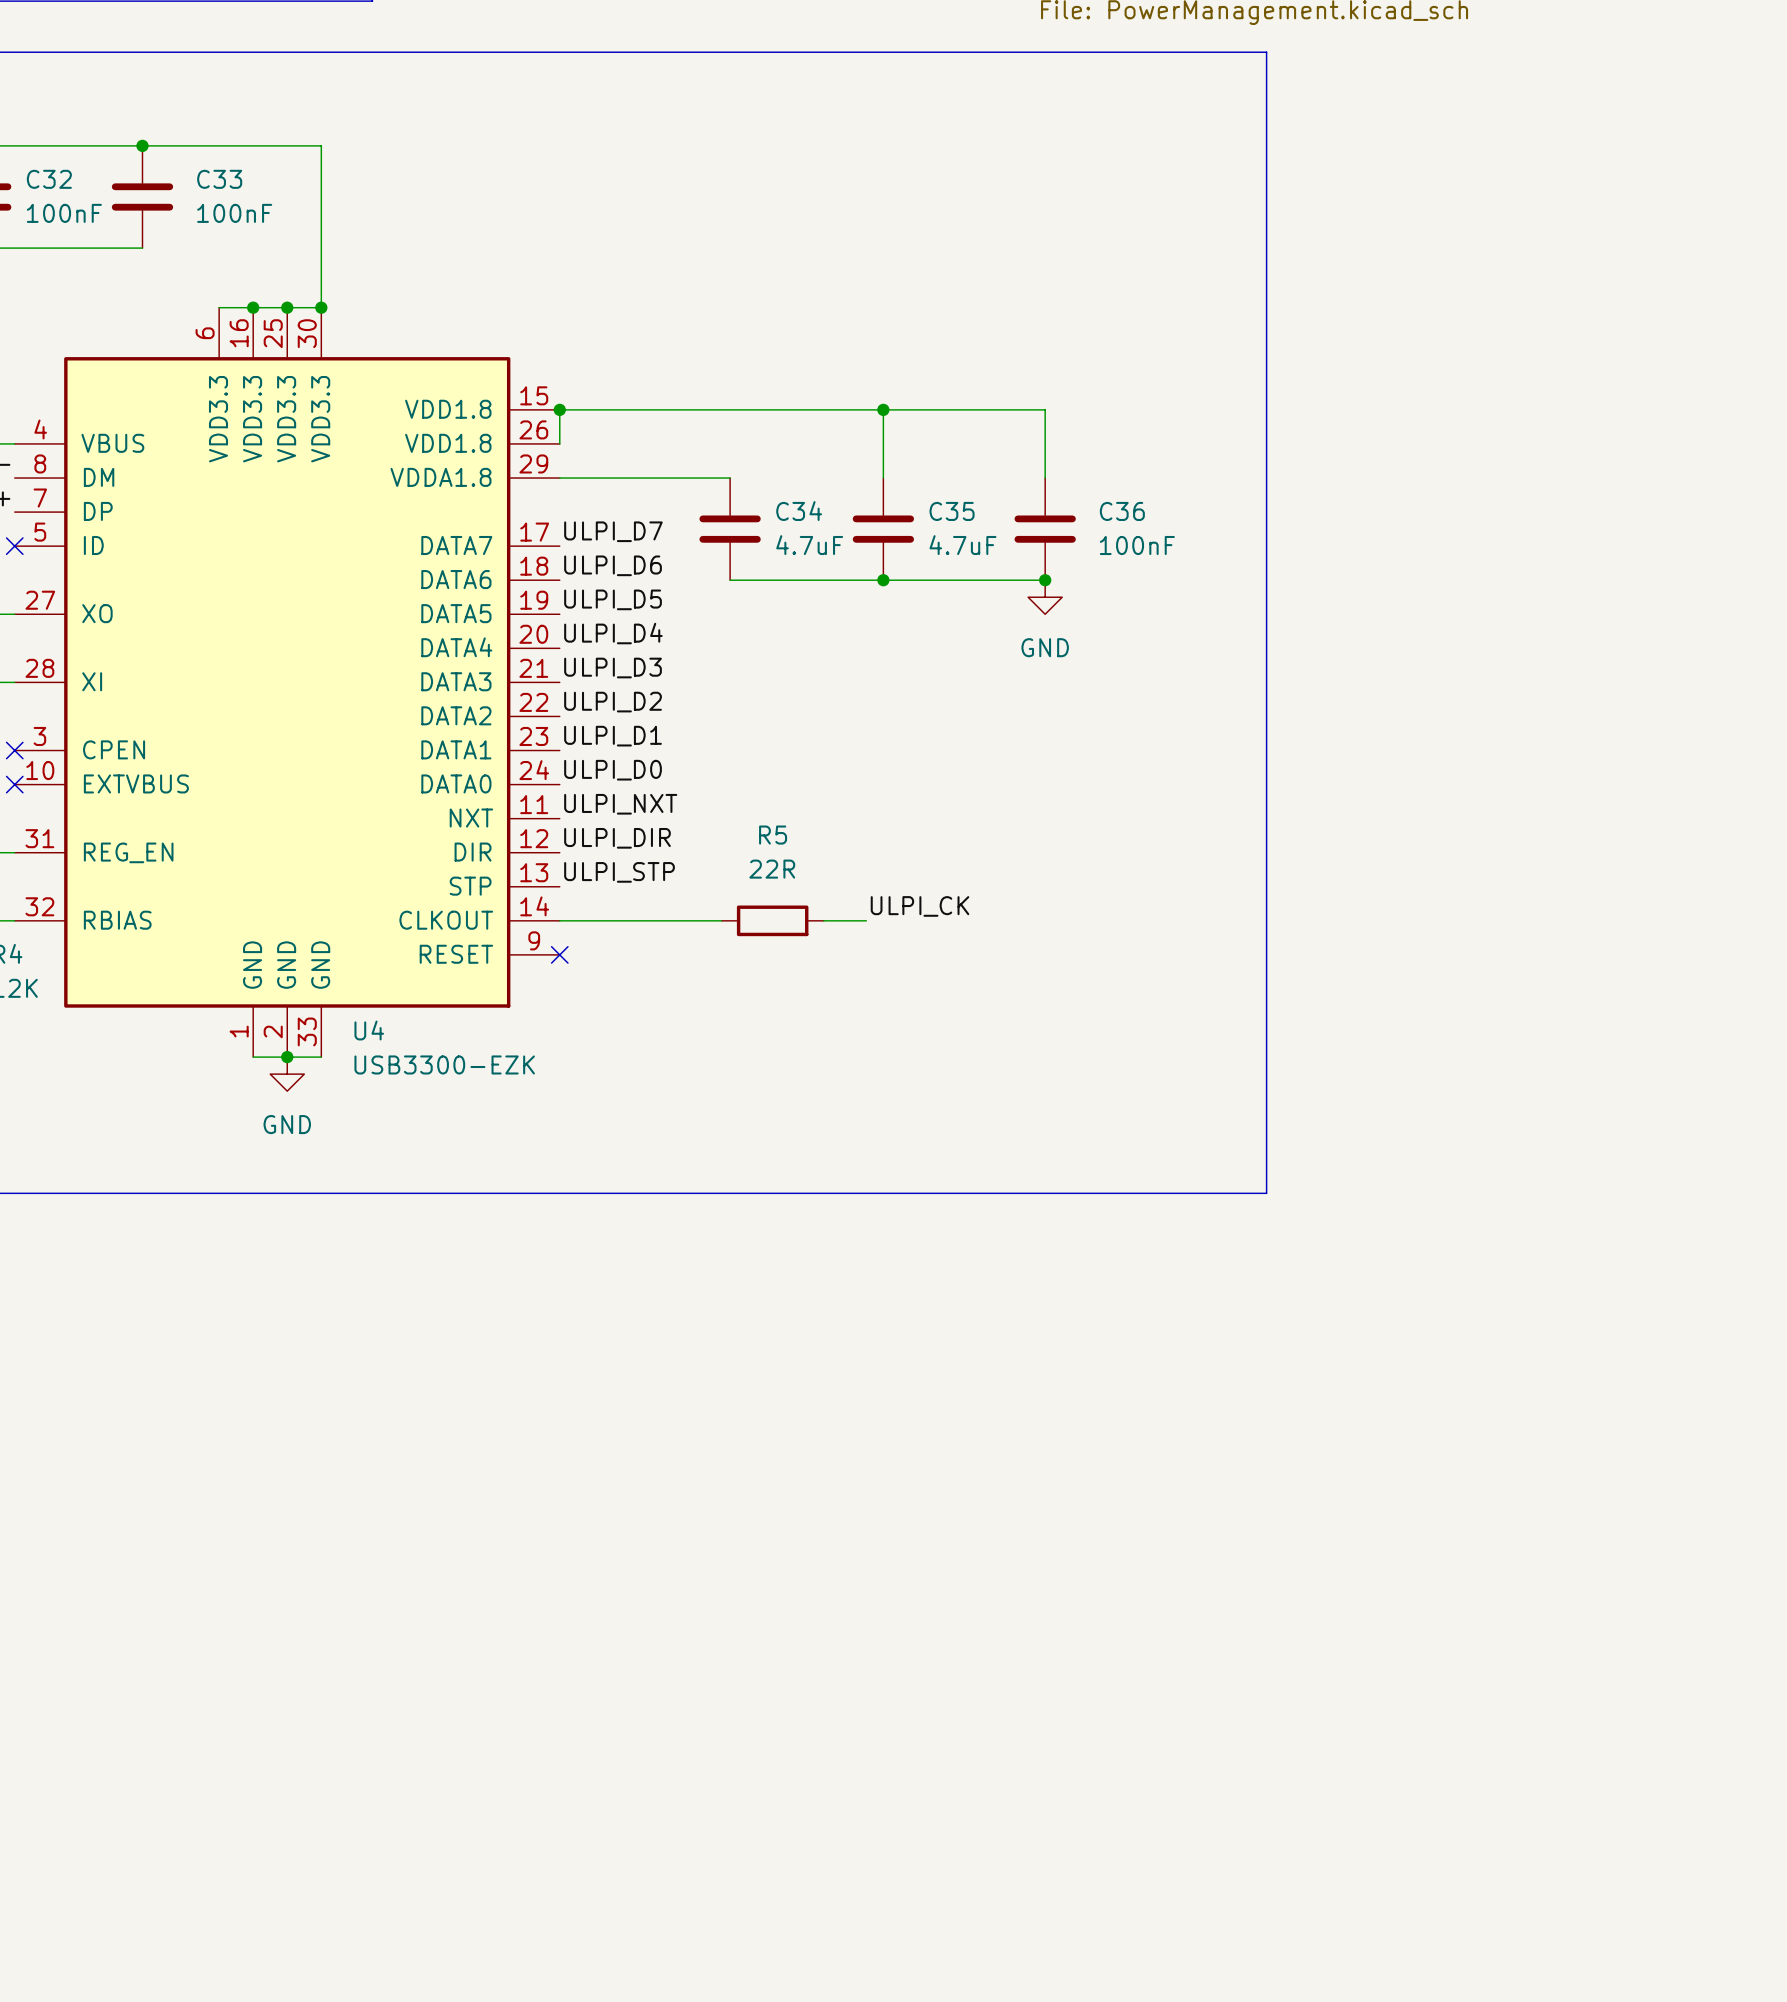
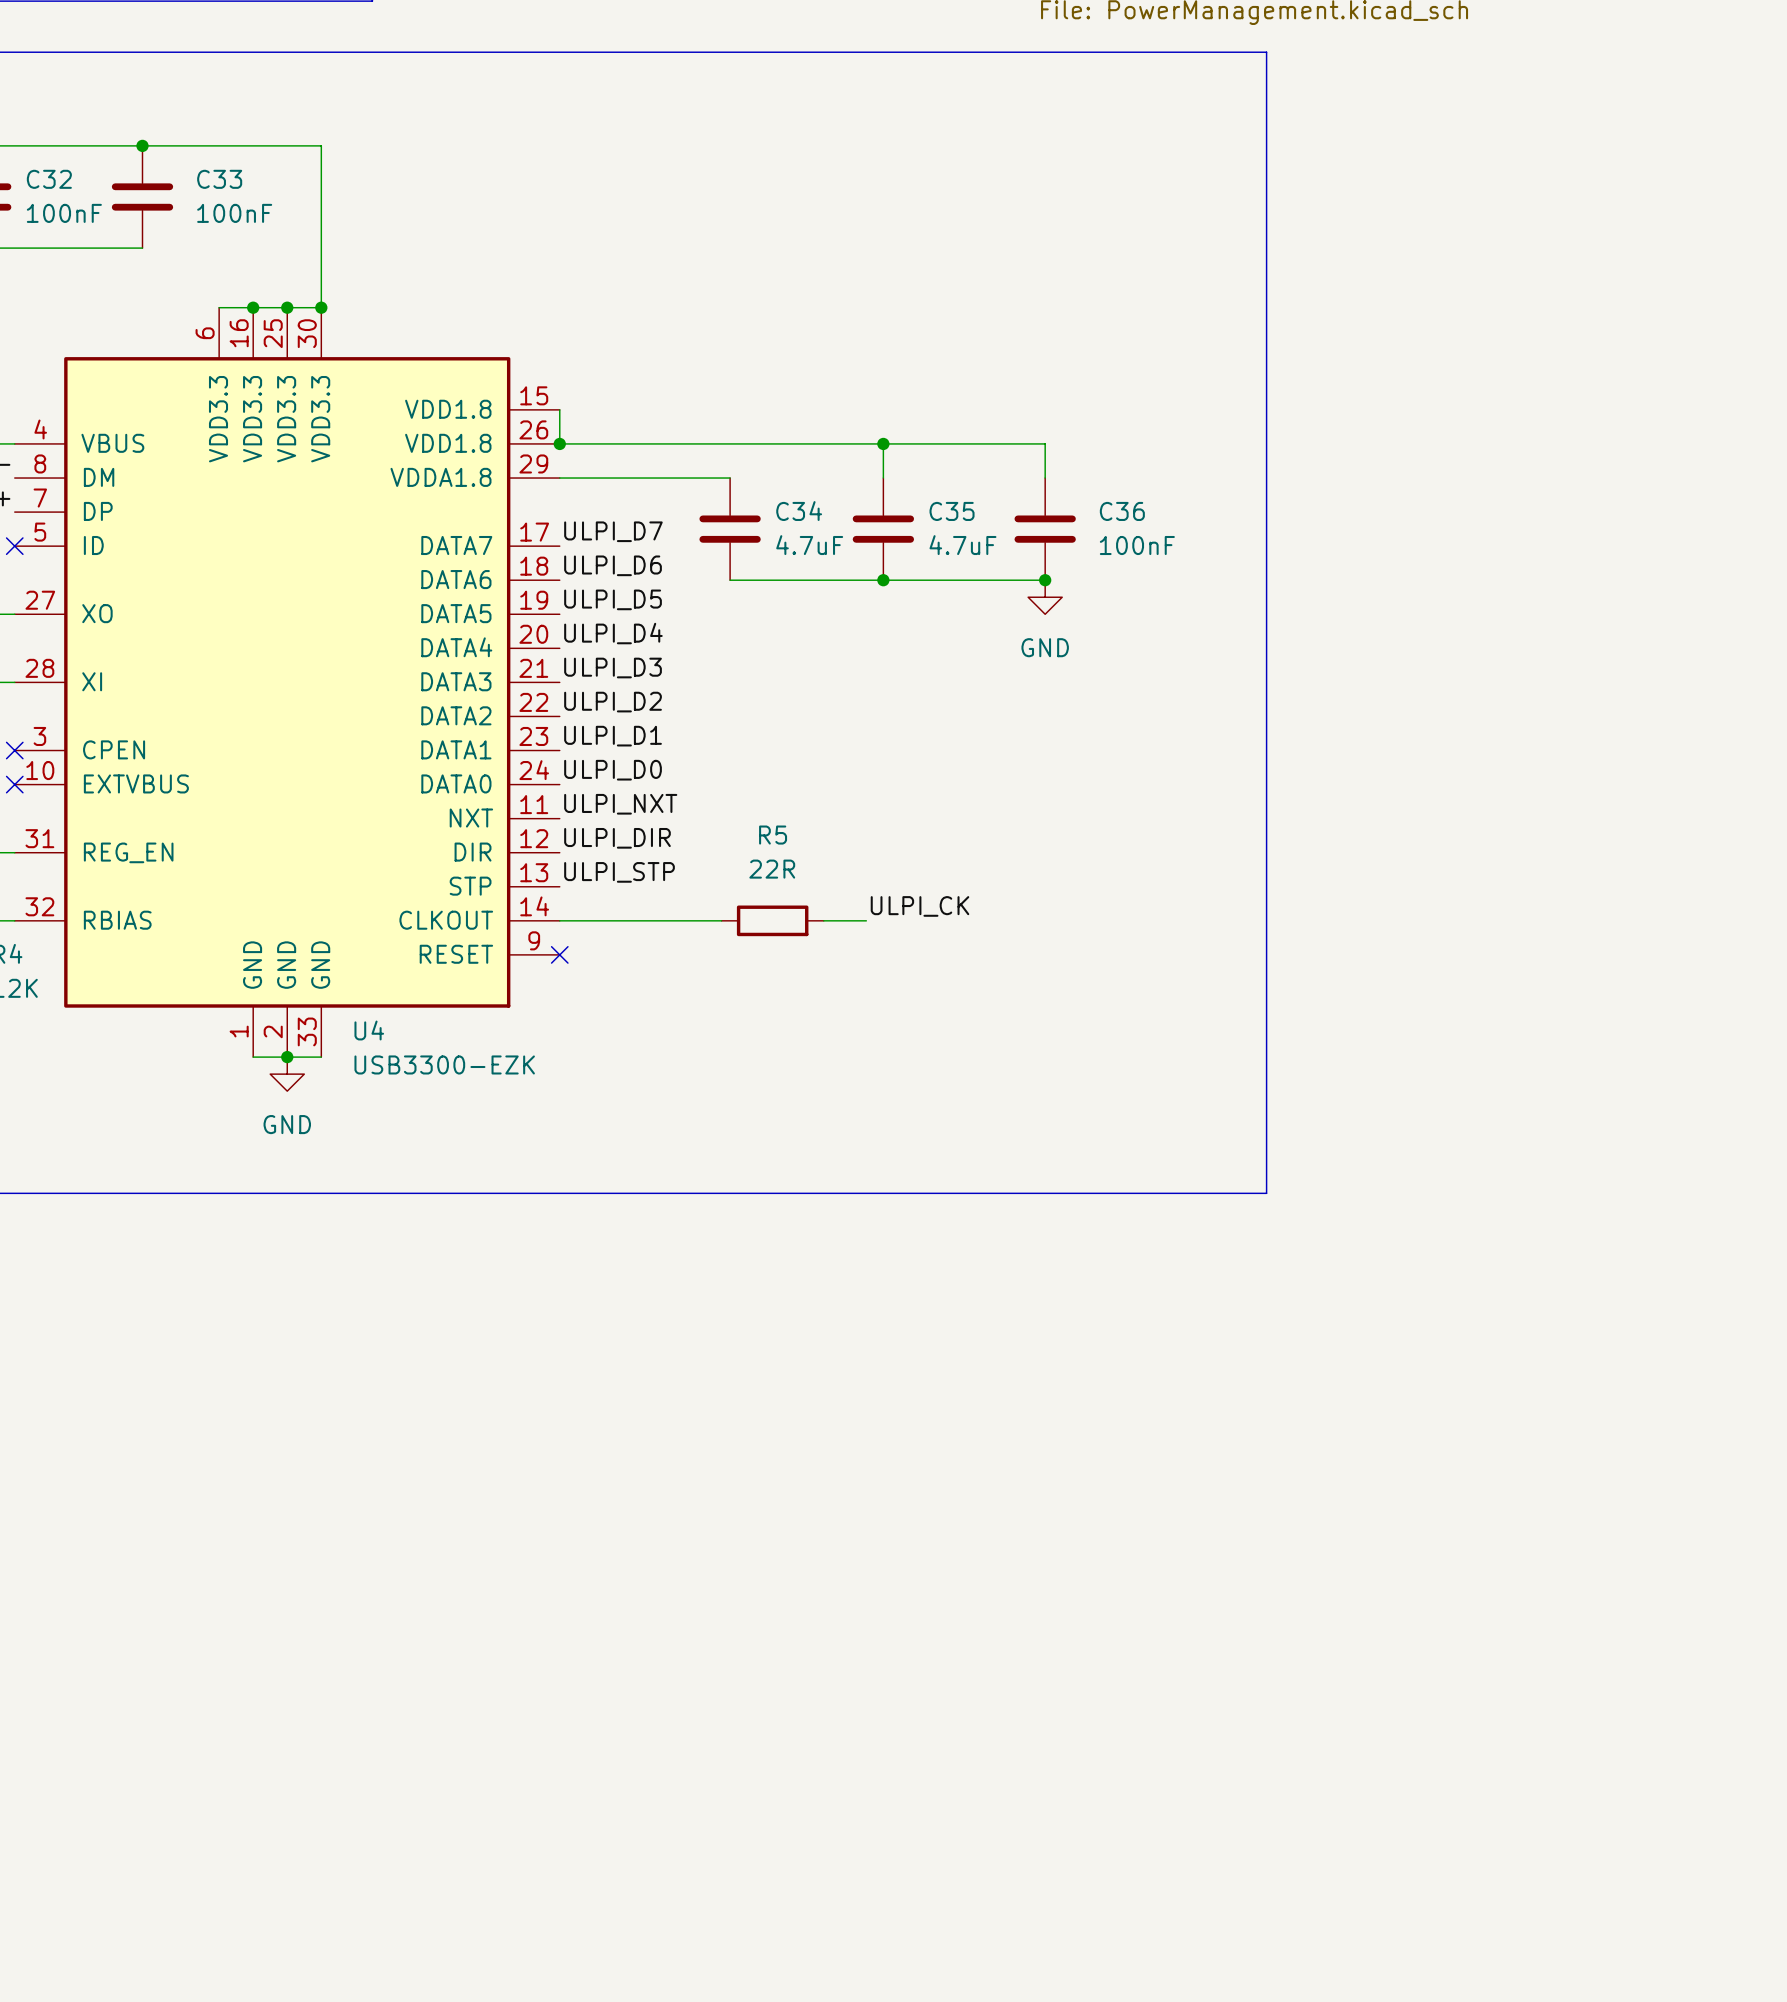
wire: (559, 409) (1045, 409) (1045, 443) -> (559, 443) (1045, 443)
junction position: (559, 409) -> (559, 443)
wire: (883, 409) (883, 443) -> none
junction position: (883, 409) -> (883, 443)

